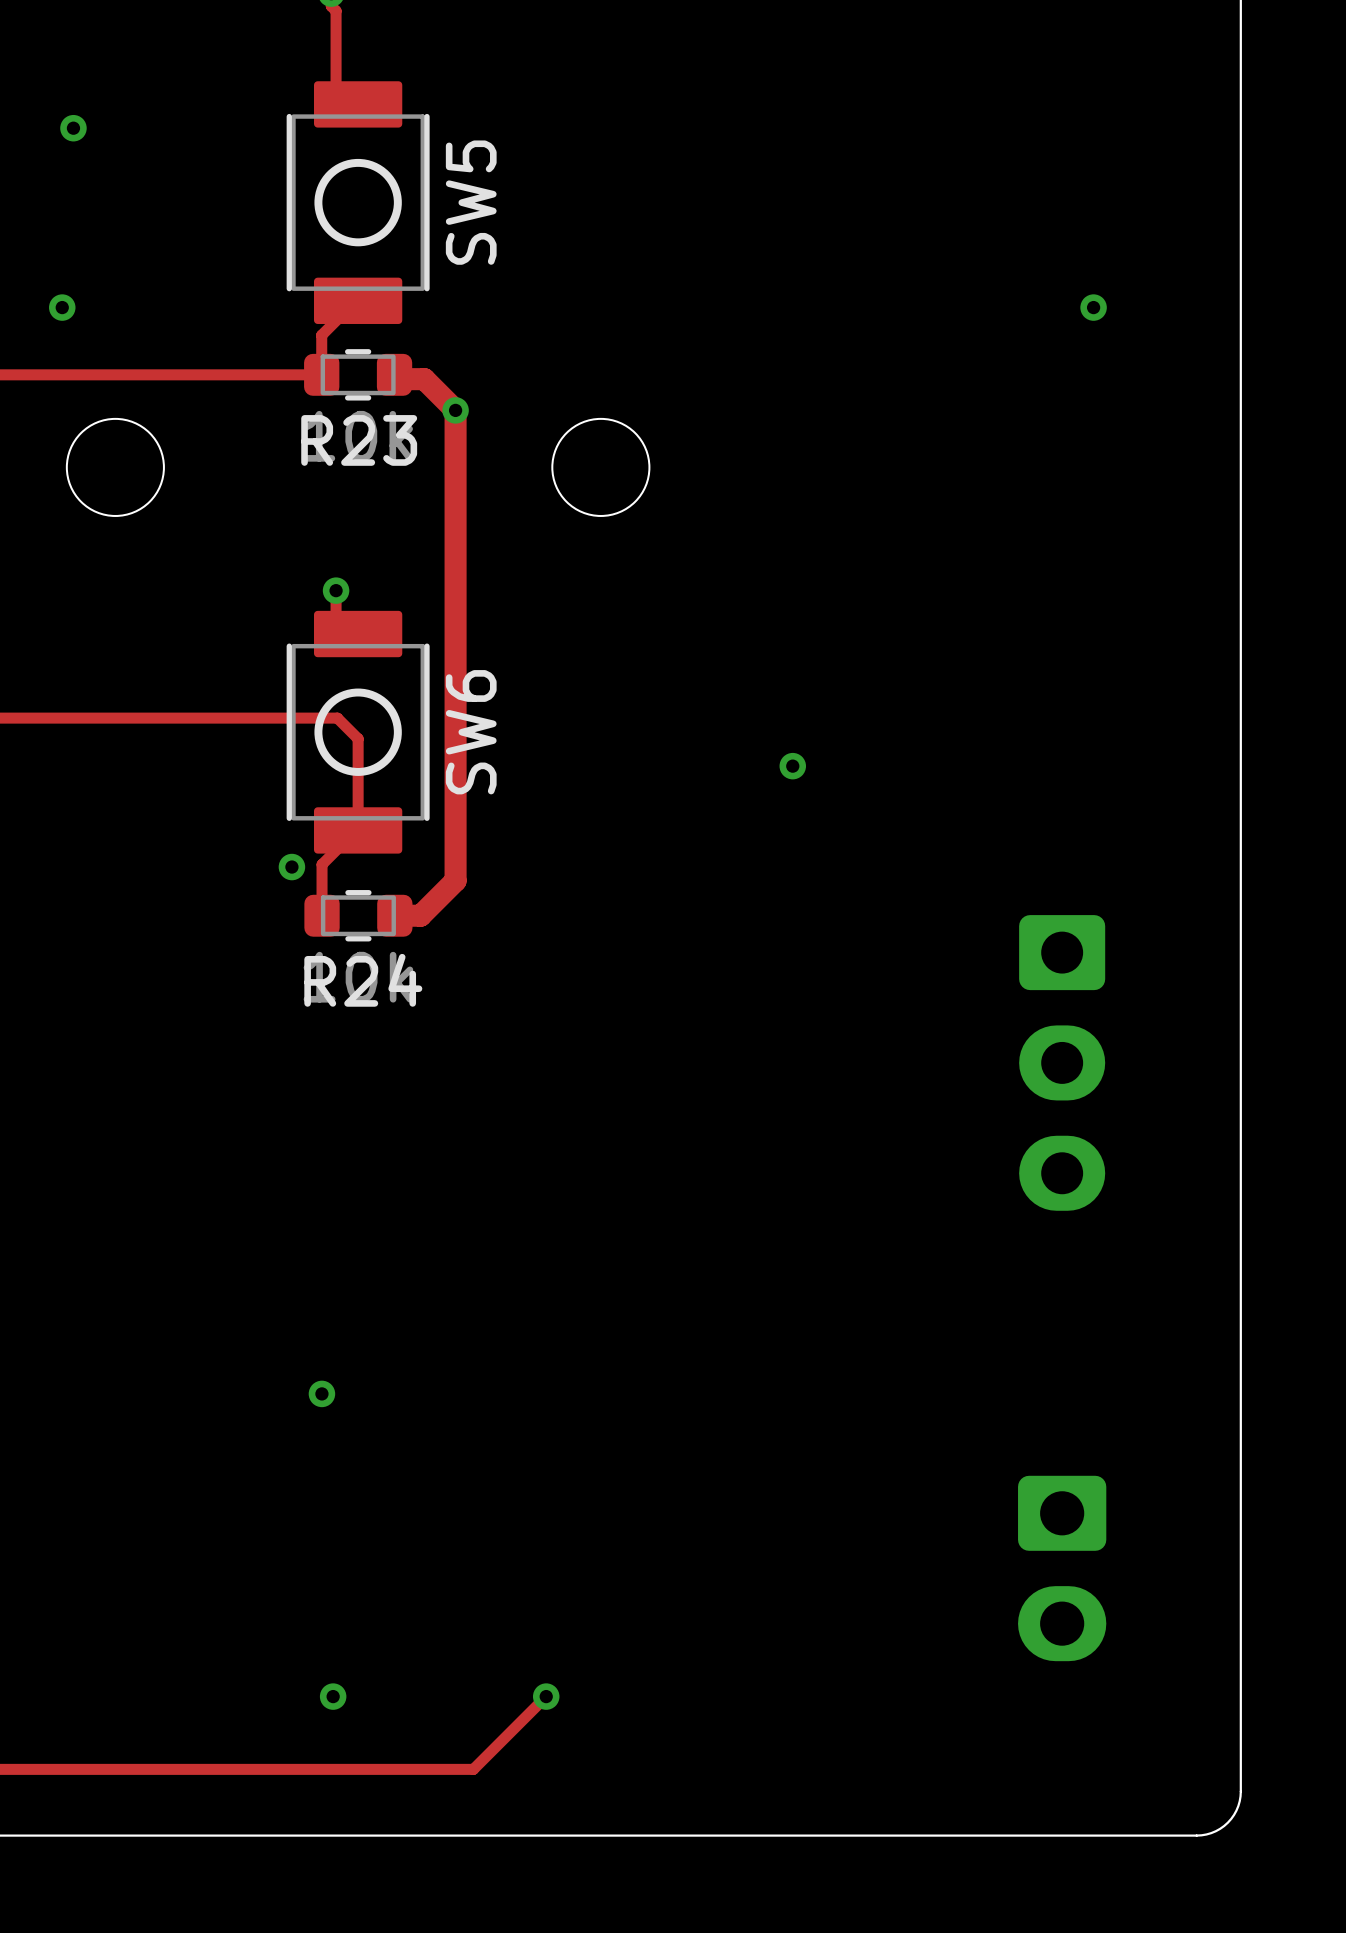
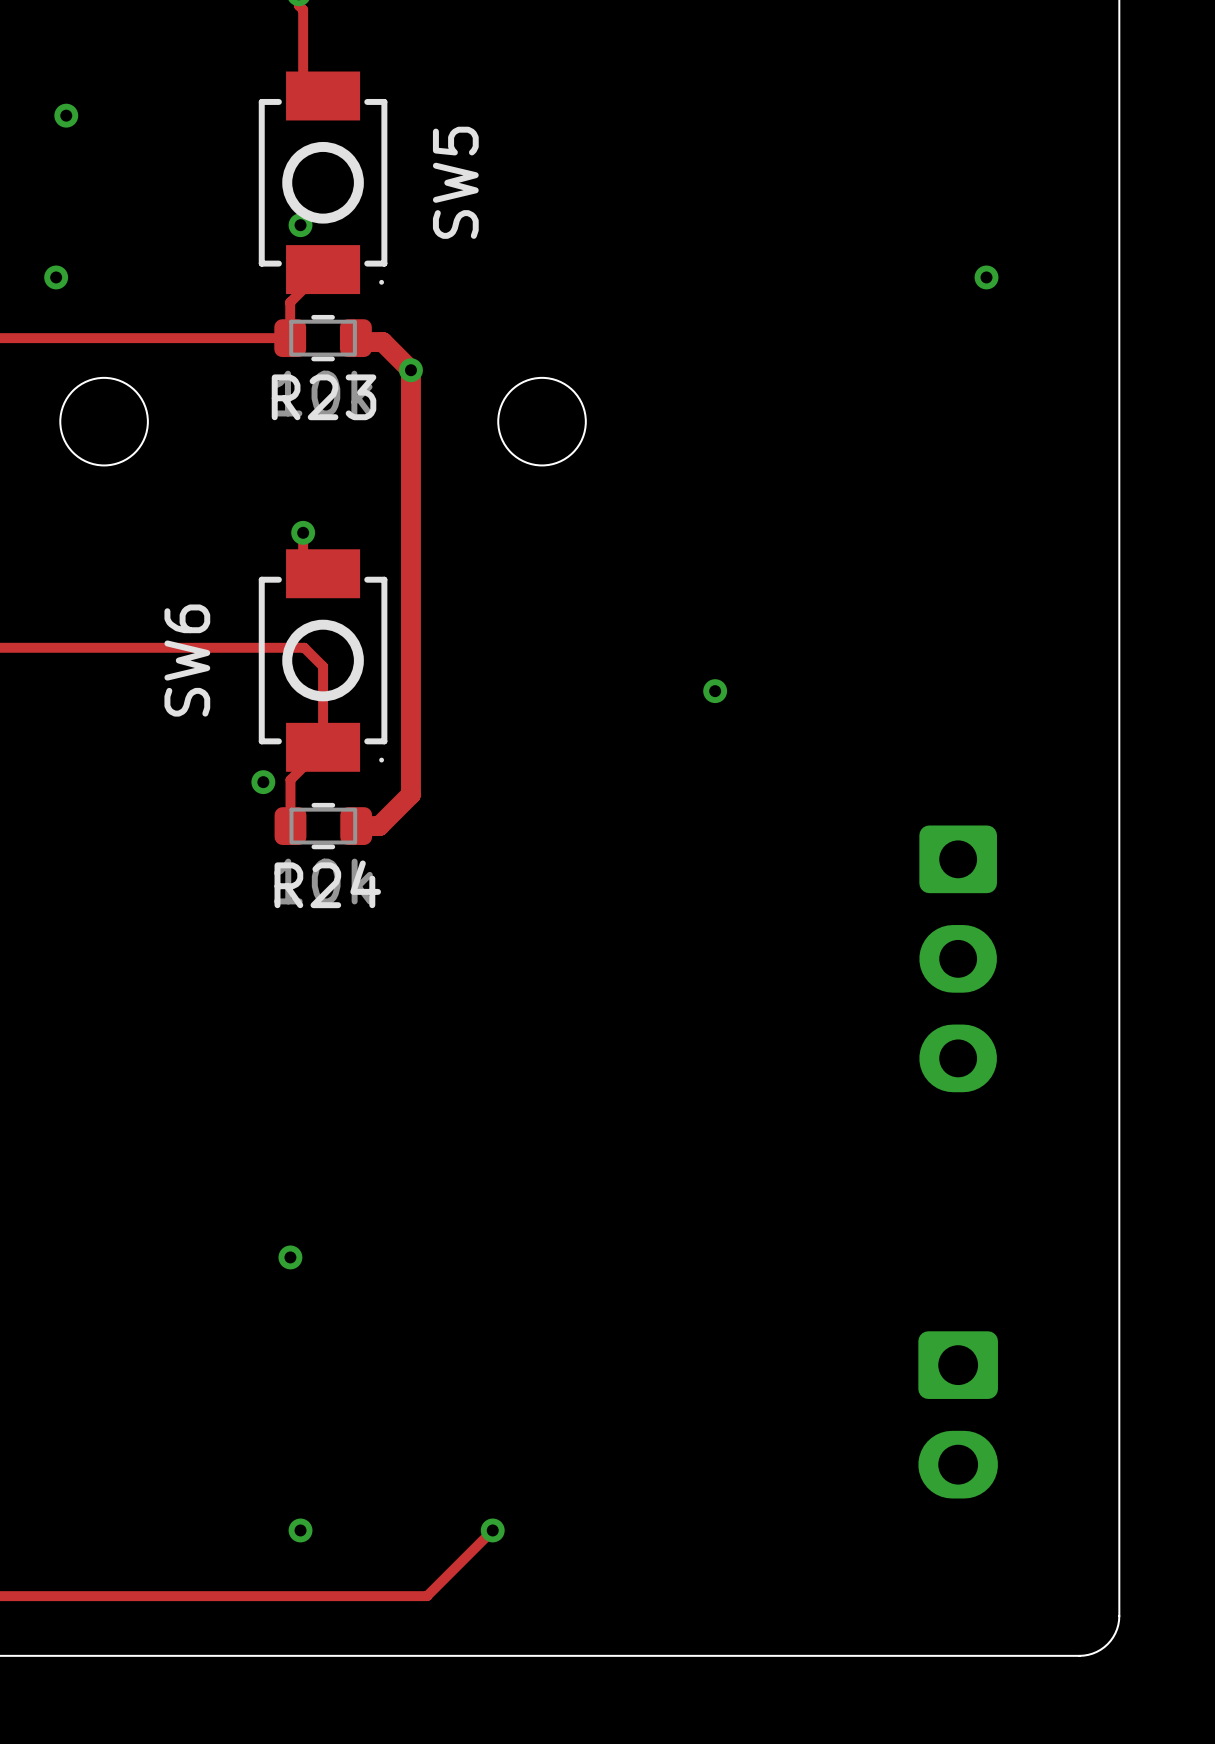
SW5 footprint: [286, 81, 430, 324] -> [258, 71, 388, 295]
via: none -> (300, 225)
SW6 footprint: [286, 610, 430, 854] -> [258, 549, 388, 772]
SW6 name position: SW6 (471, 732) -> SW6 (187, 660)

